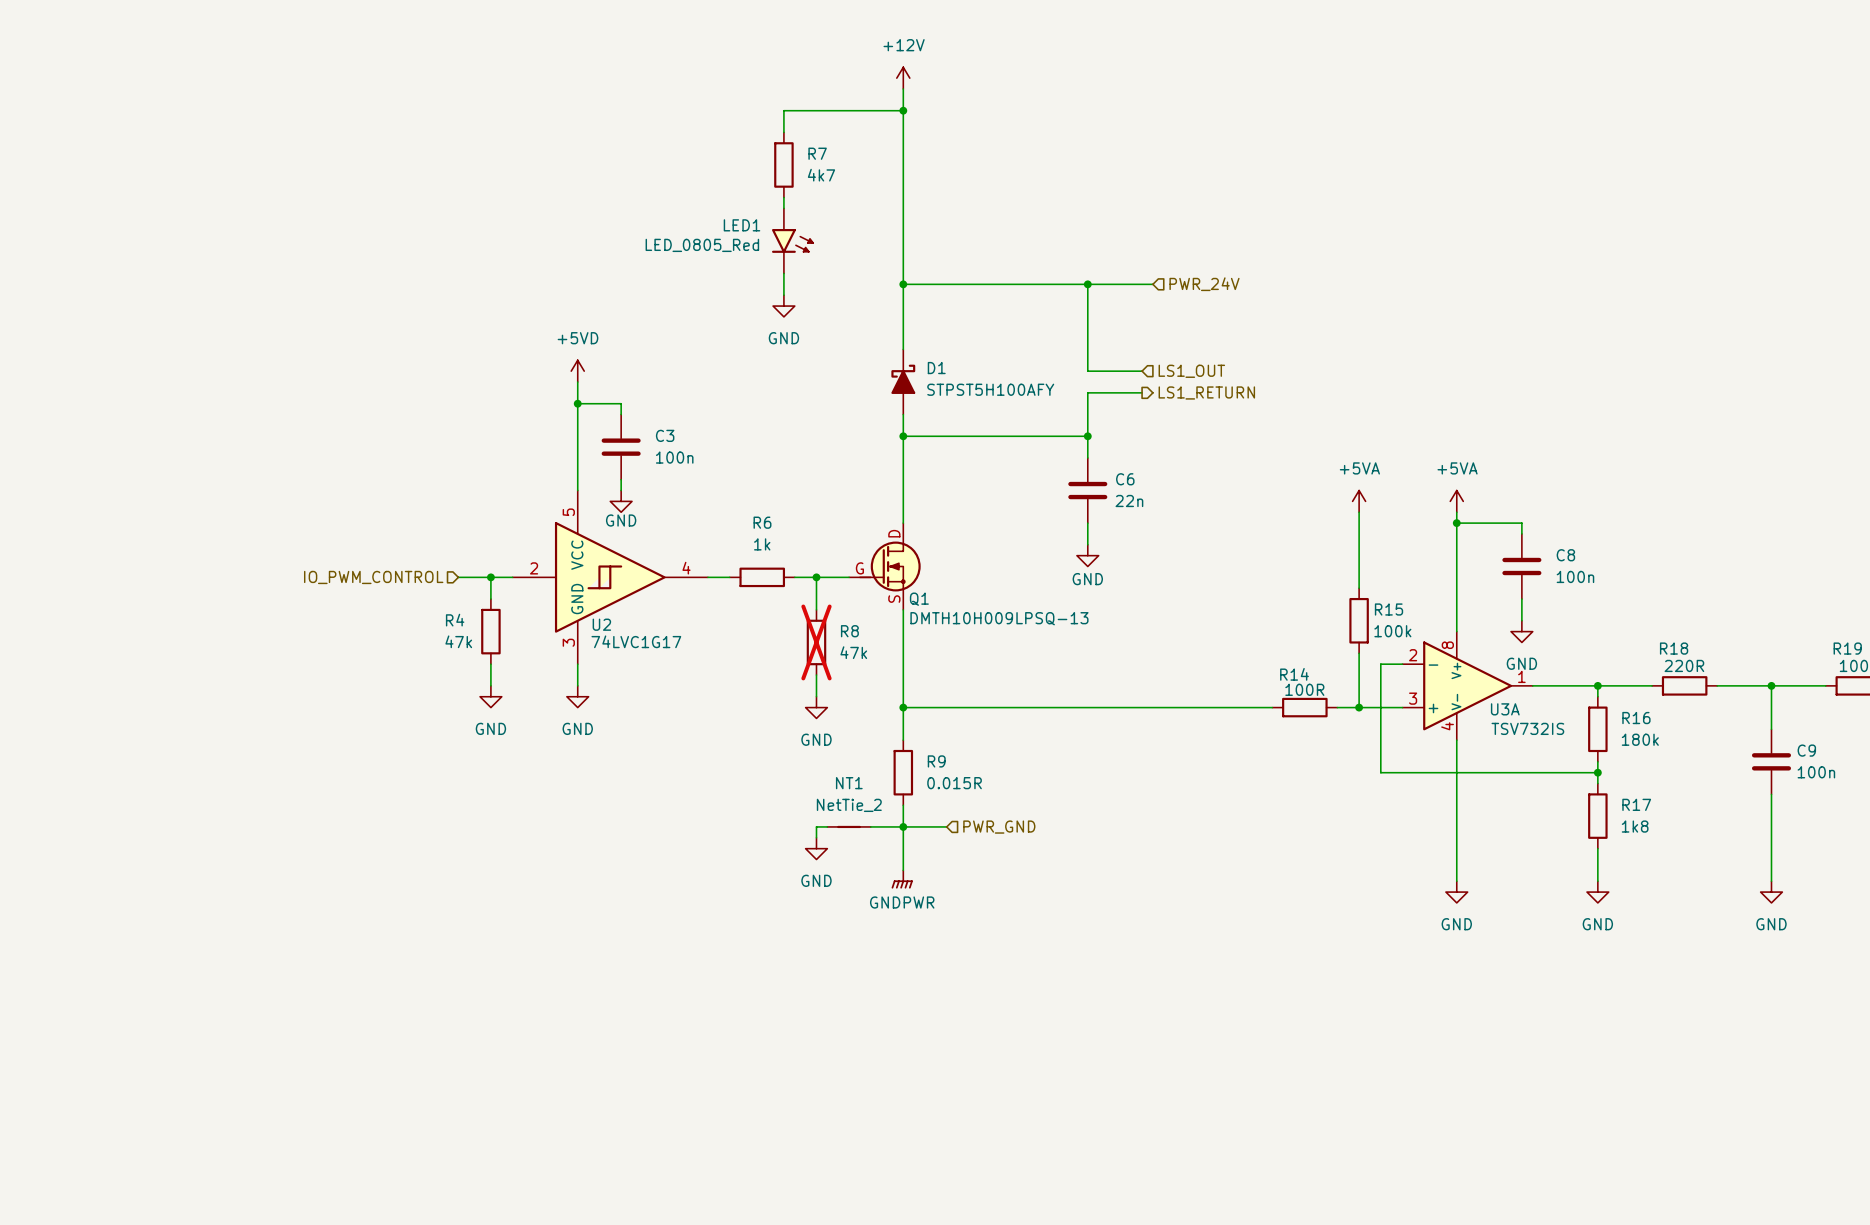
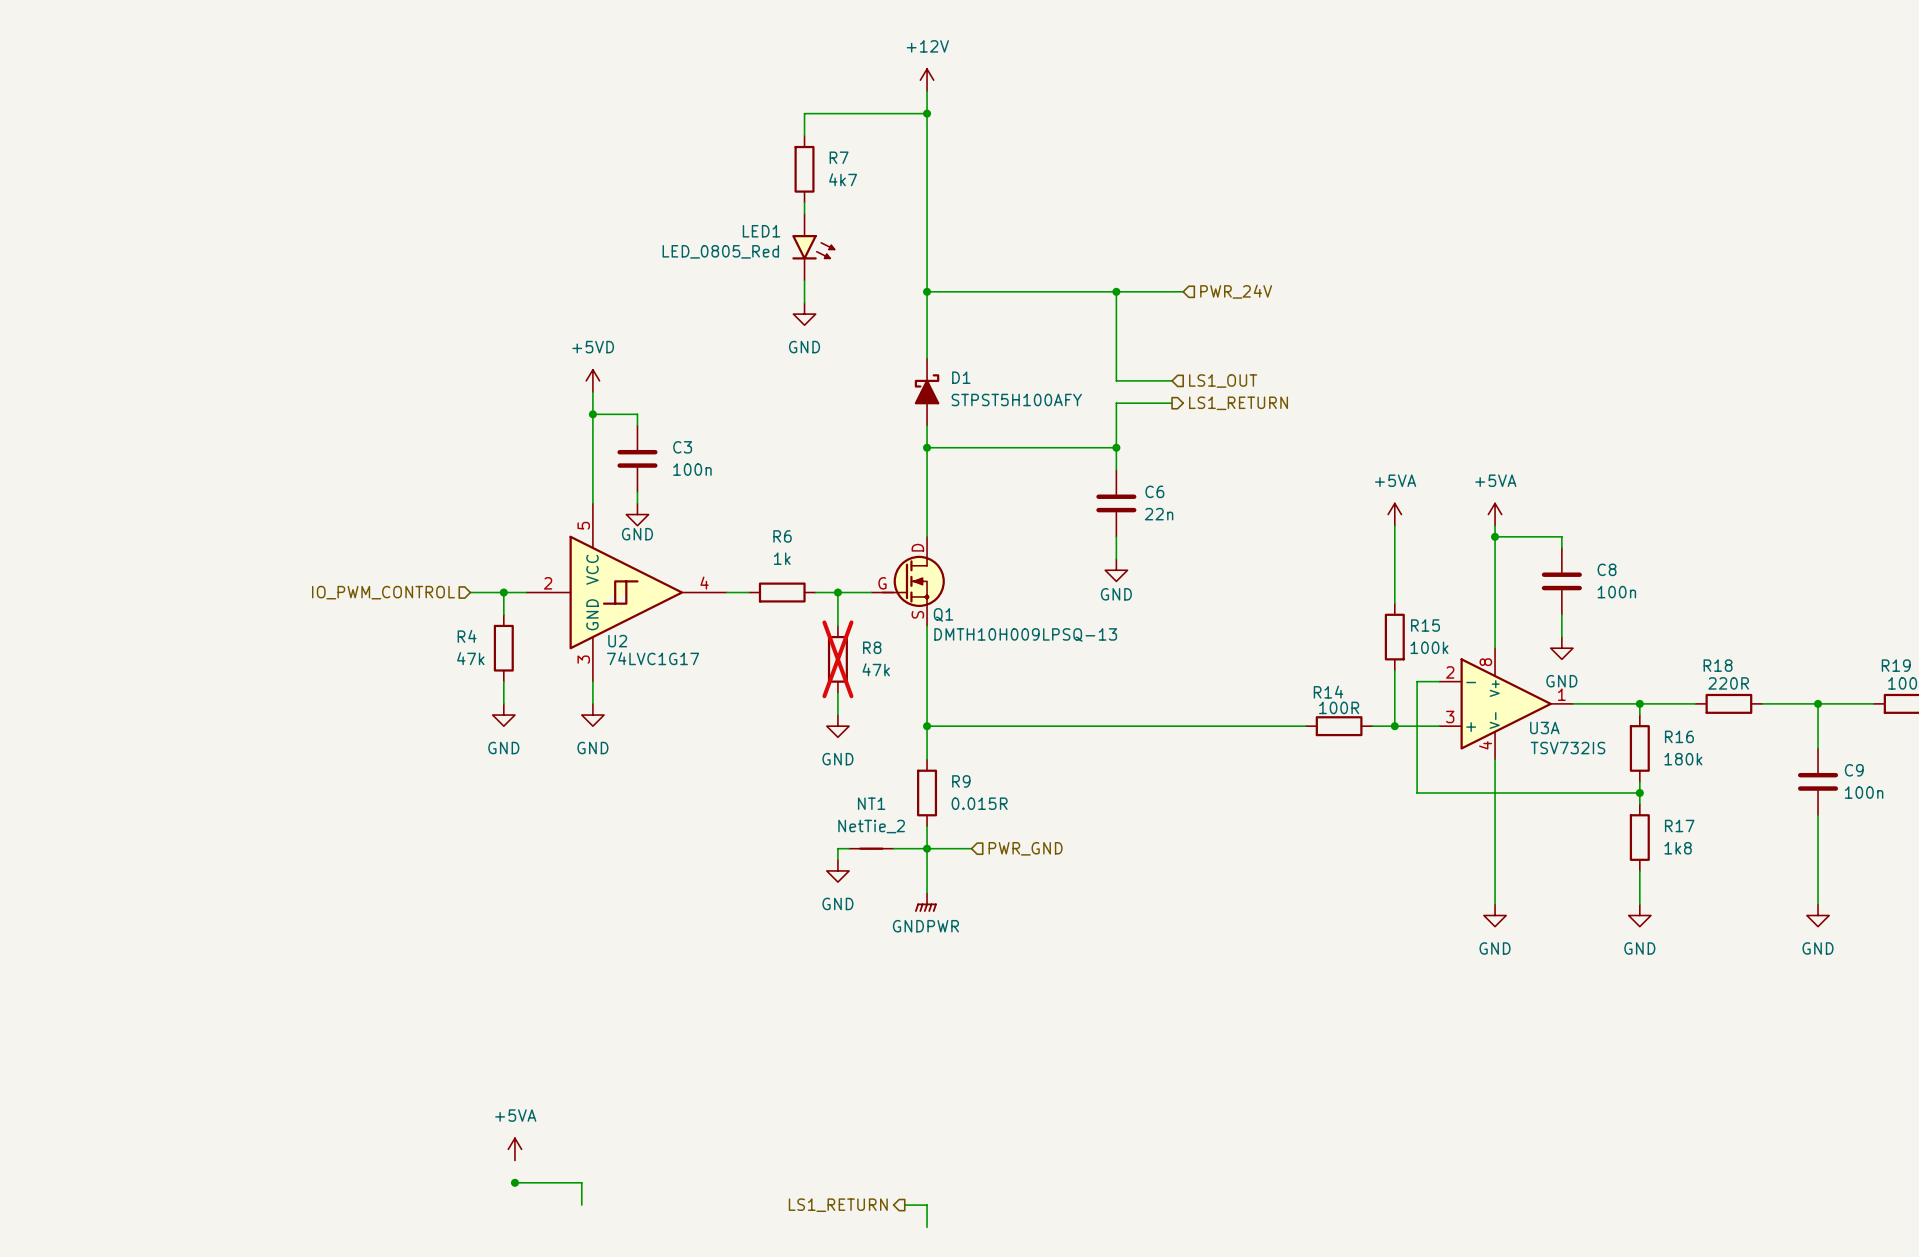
power symbol: none -> +5VA (514, 1149)
wire: none -> (514, 1182) (581, 1182) (581, 1205)
junction: none -> (514, 1182)
hierarchical label: none -> LS1_RETURN (838, 1205)
wire: none -> (904, 1205) (927, 1205) (927, 1227)

